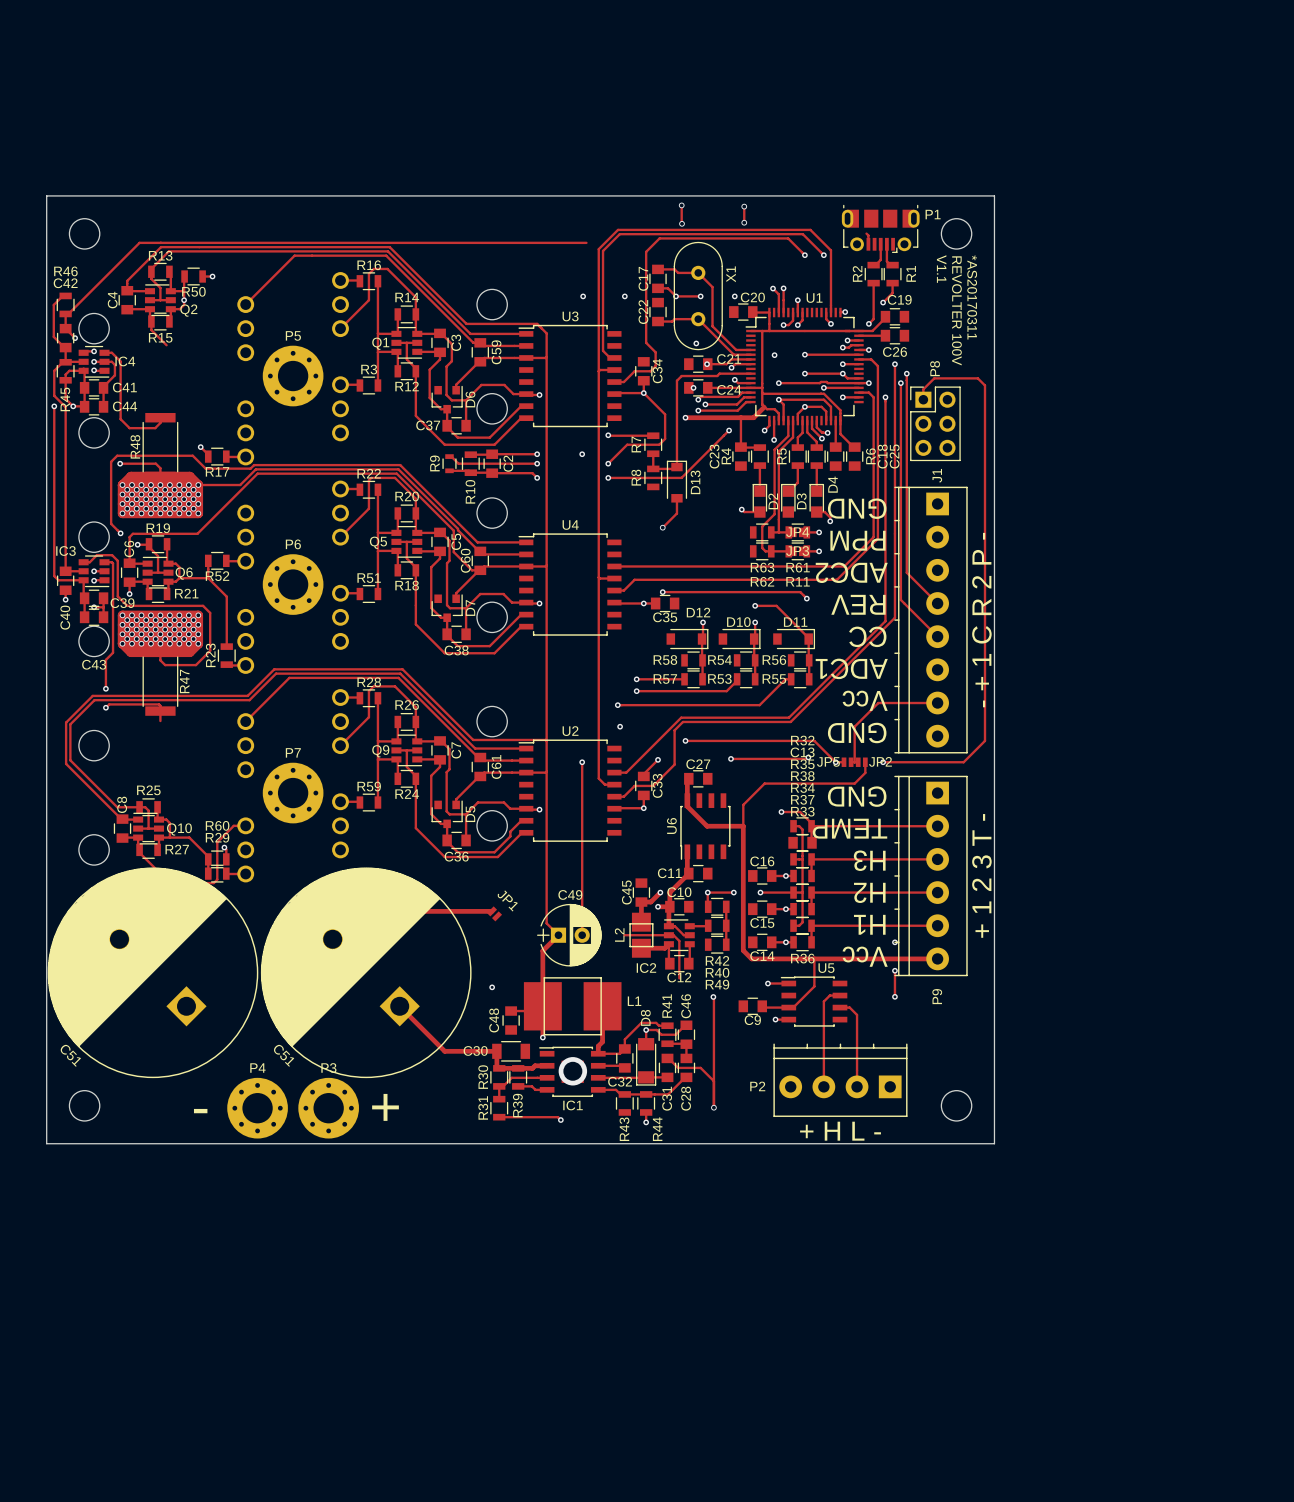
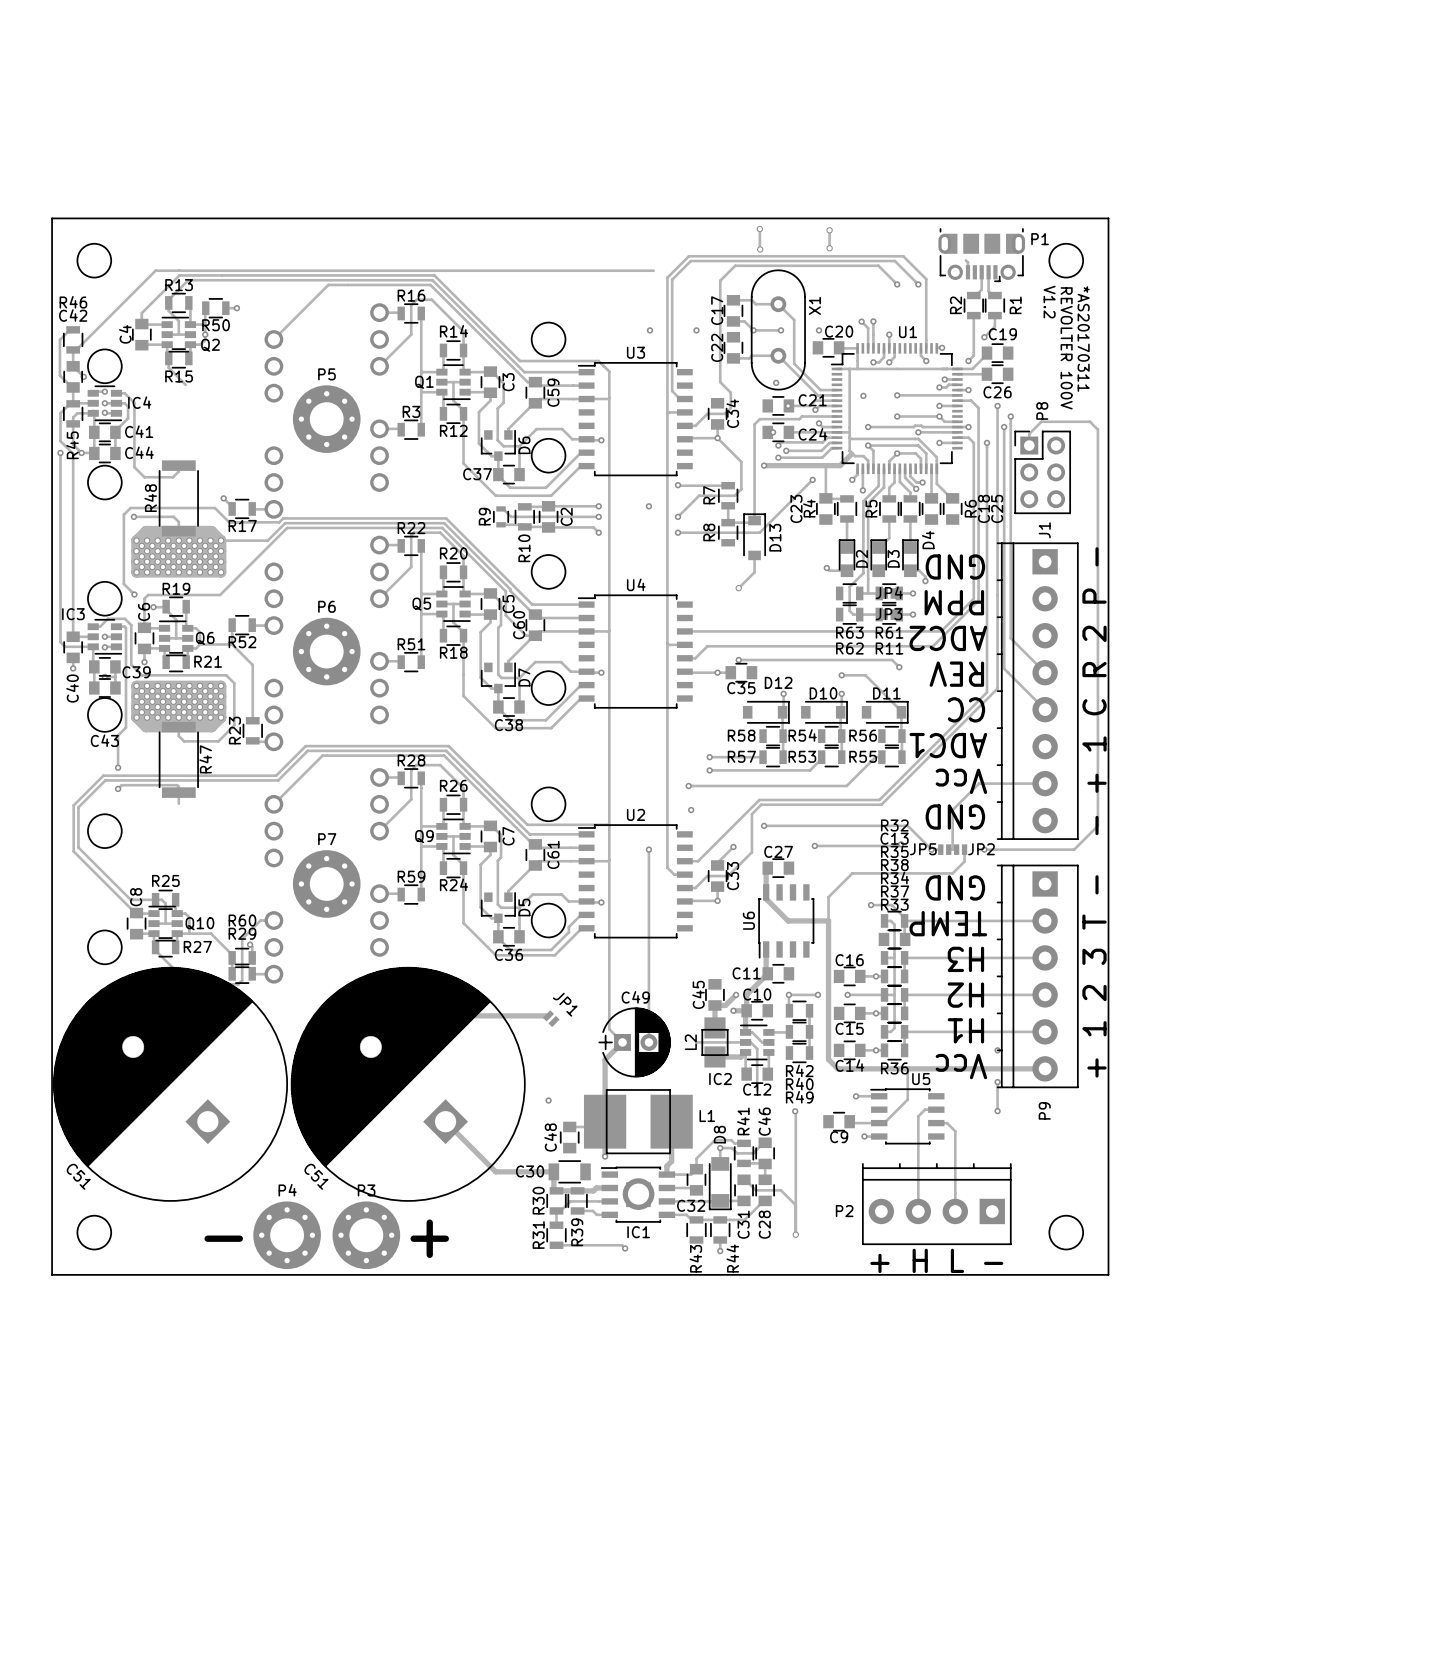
text: V1.1 (941, 269) -> V1.2 (1049, 302)

